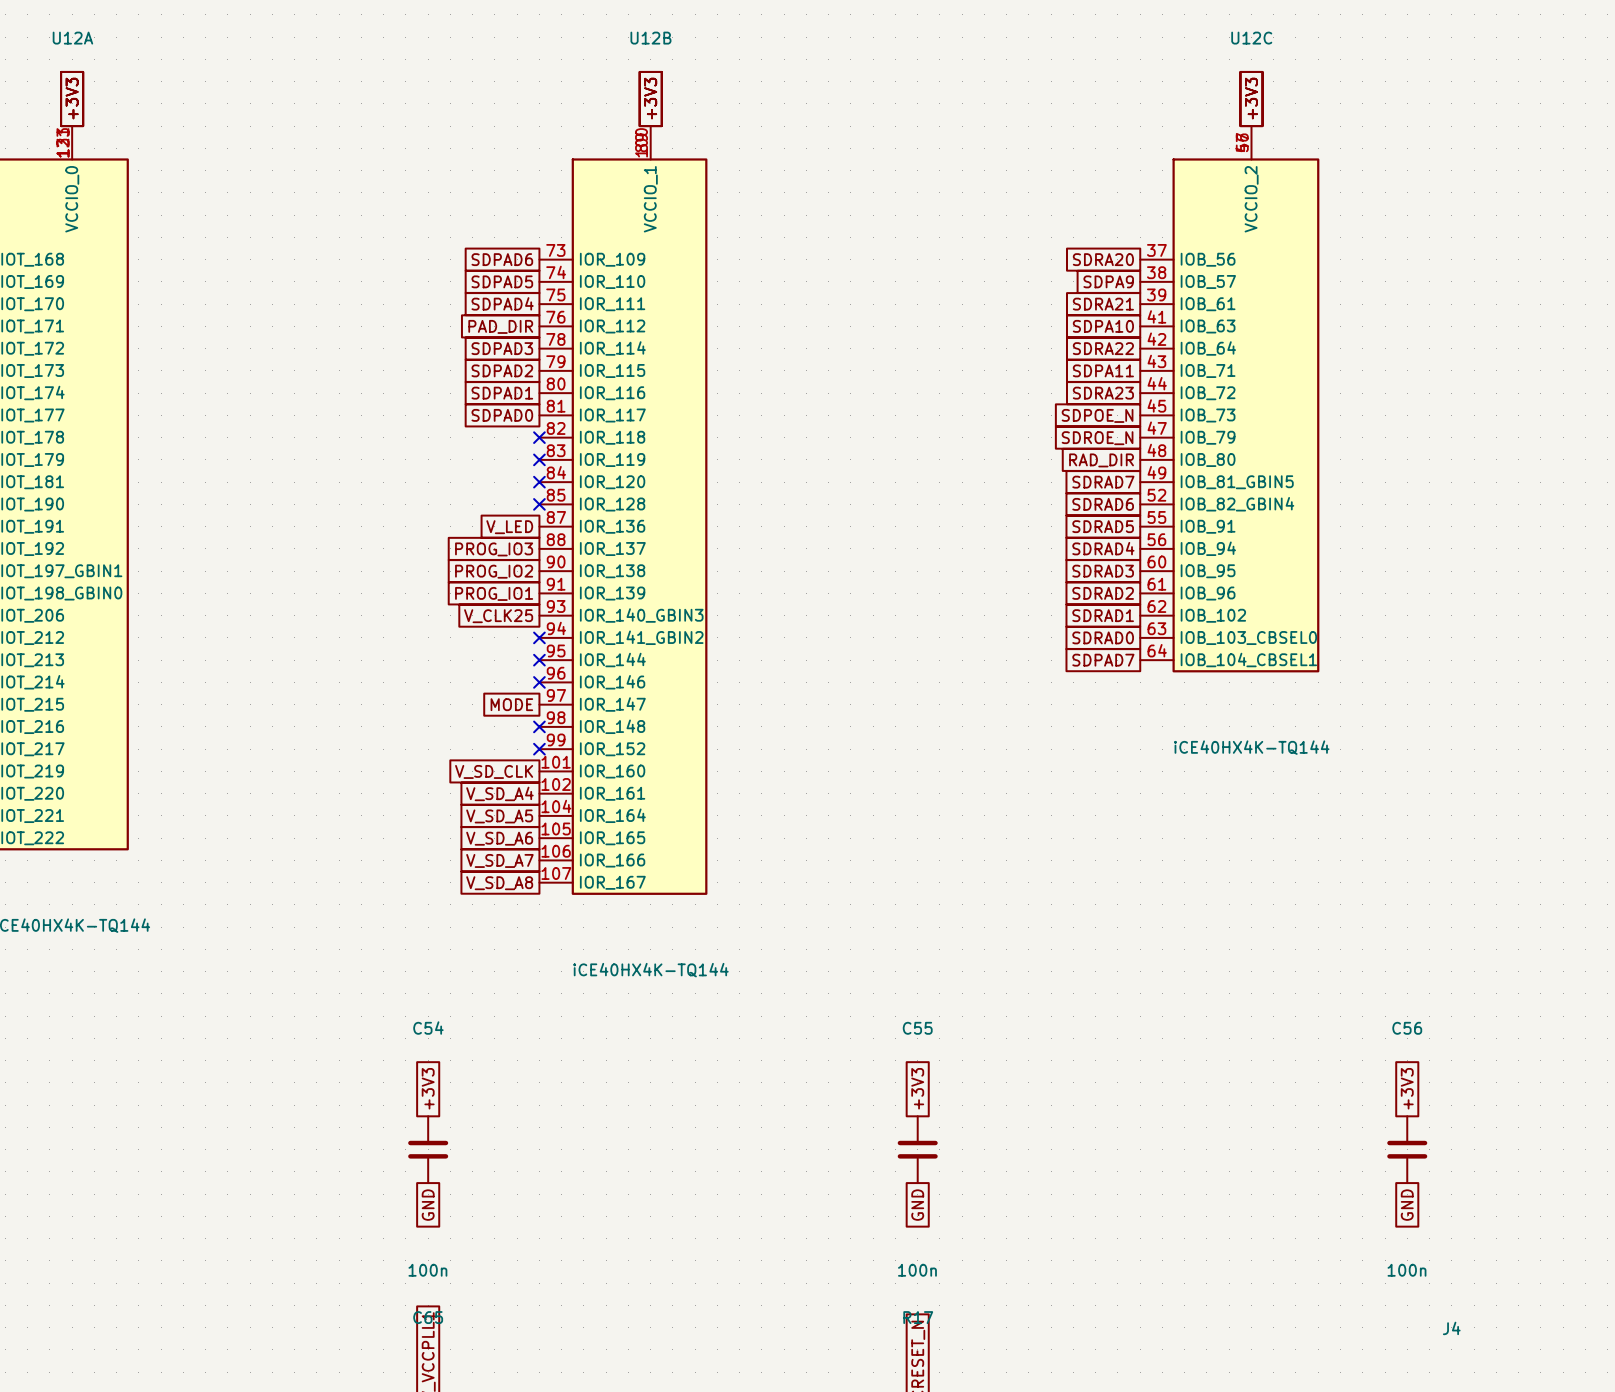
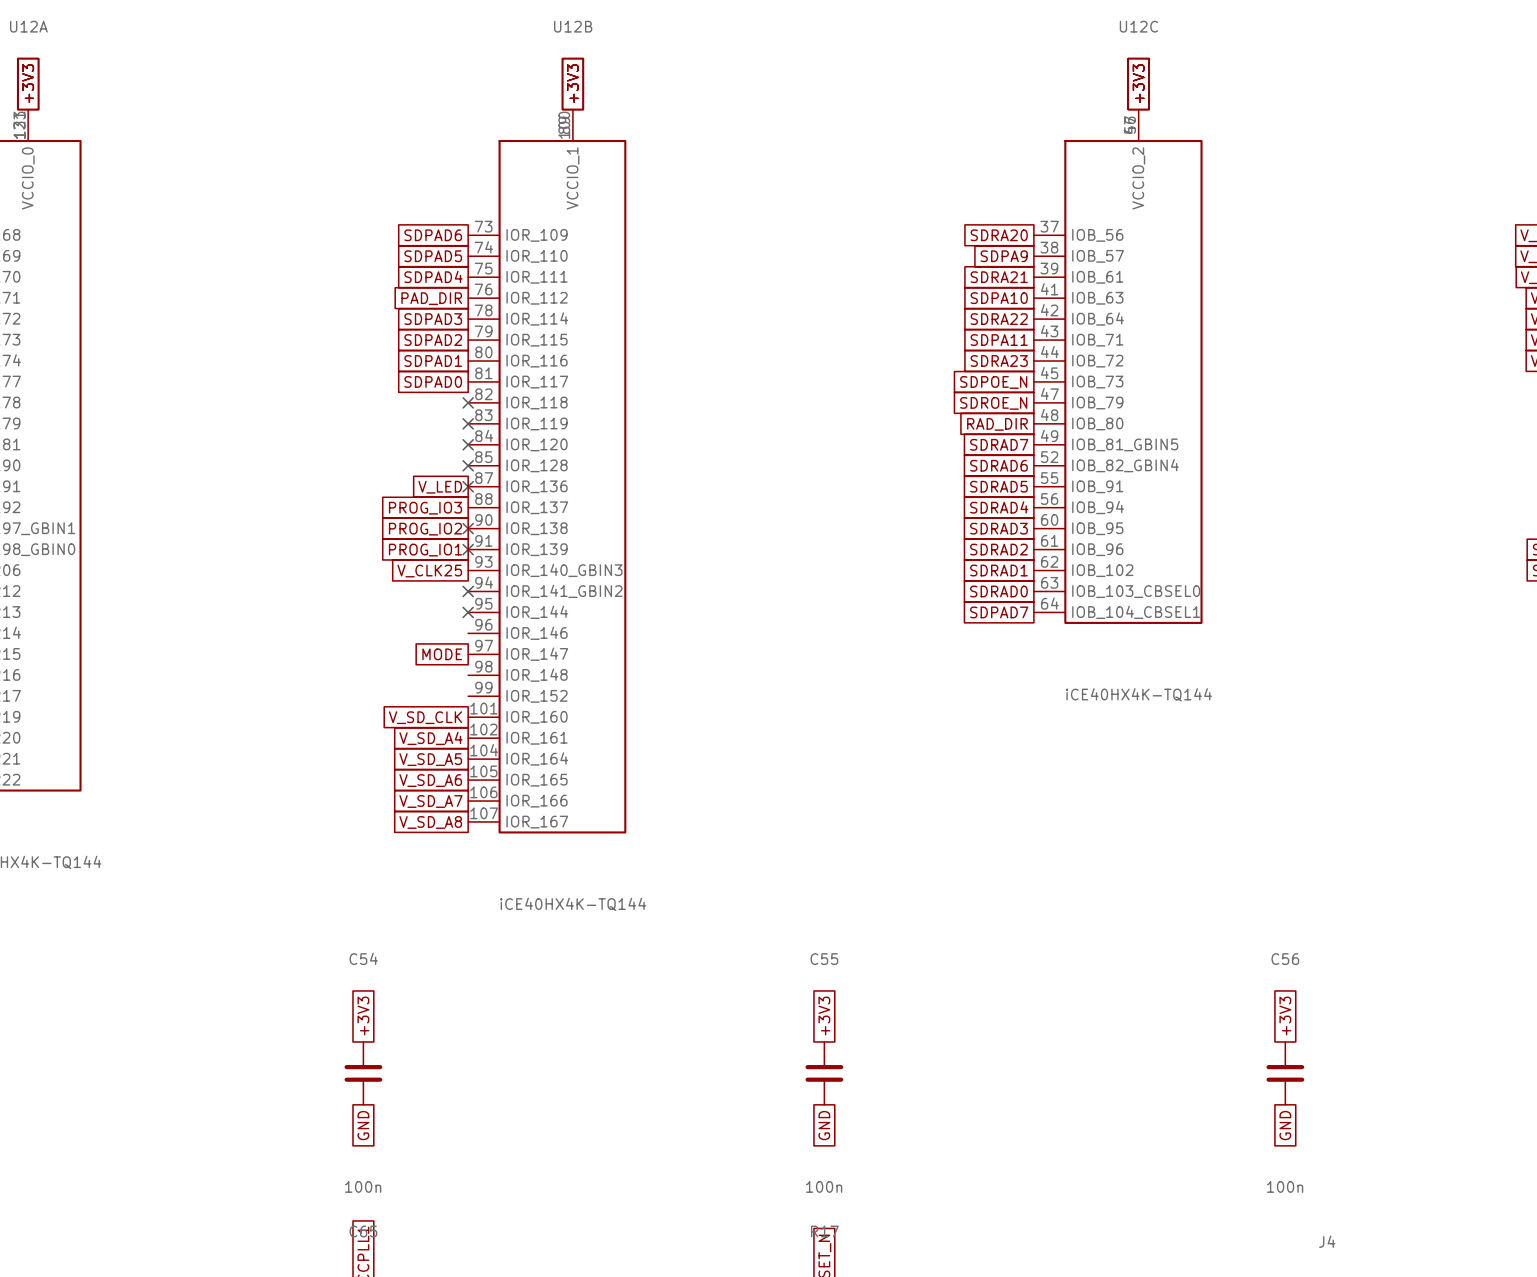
no-connect mark: none -> (468, 486)
no-connect mark: none -> (468, 528)
no-connect mark: none -> (468, 549)
no-connect mark: (539, 682) -> none
no-connect mark: (539, 726) -> none
no-connect mark: (539, 749) -> none

